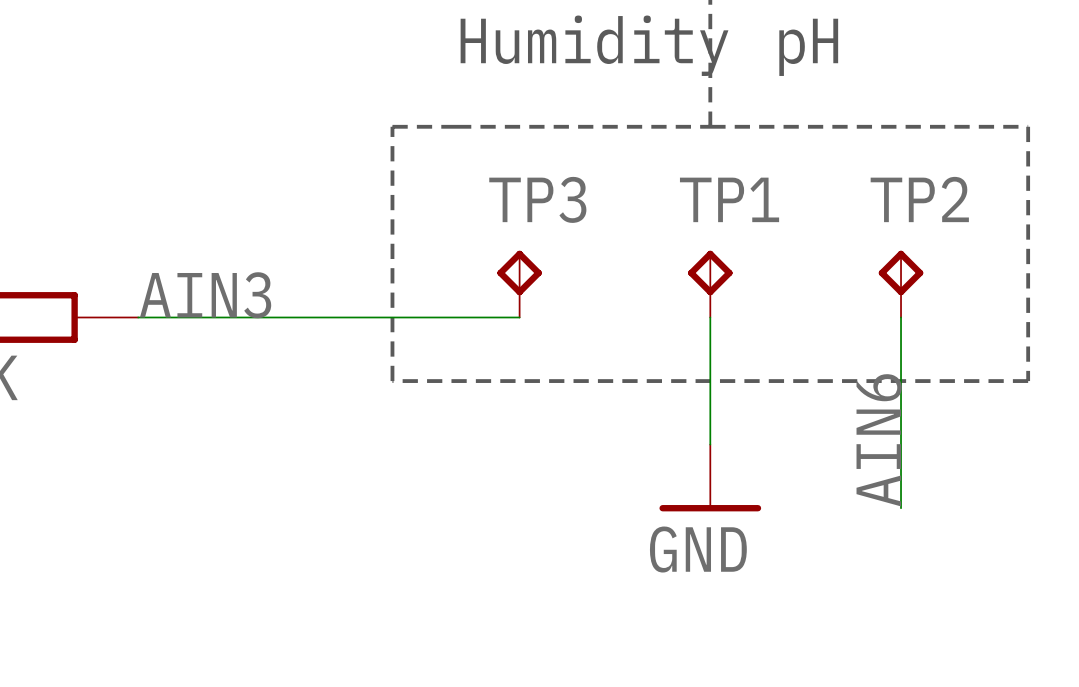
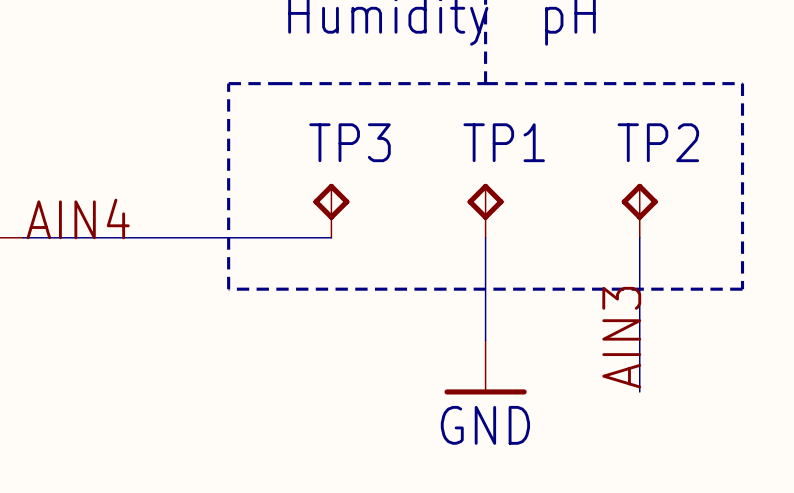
label: AIN3 (205, 295) -> AIN4 (78, 218)
label: AIN6 (879, 440) -> AIN3 (621, 337)

